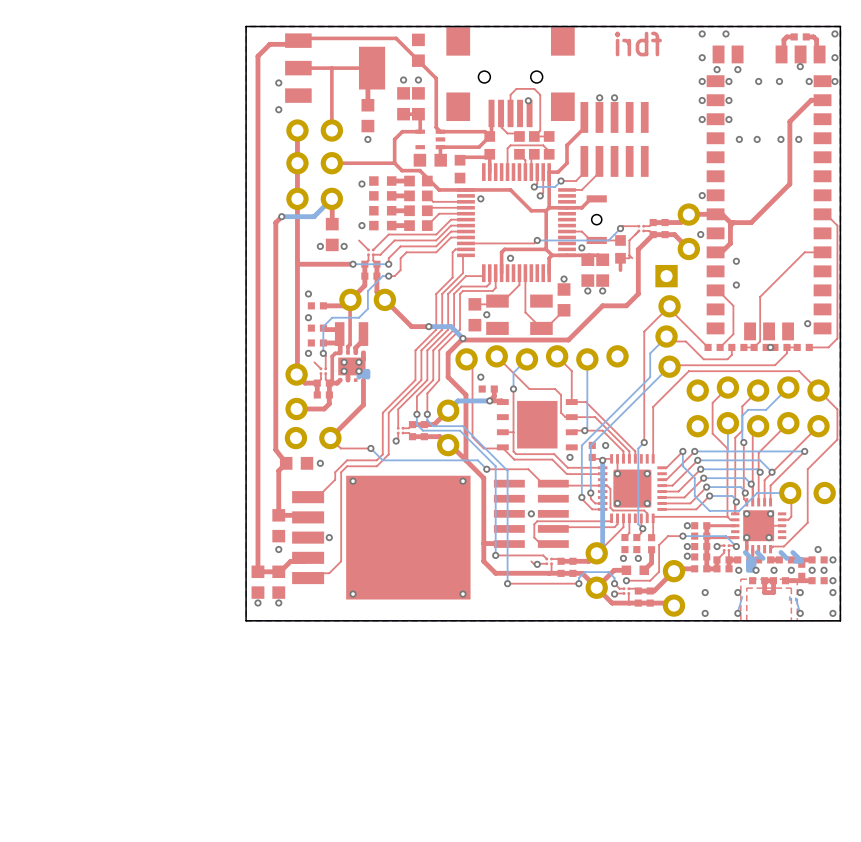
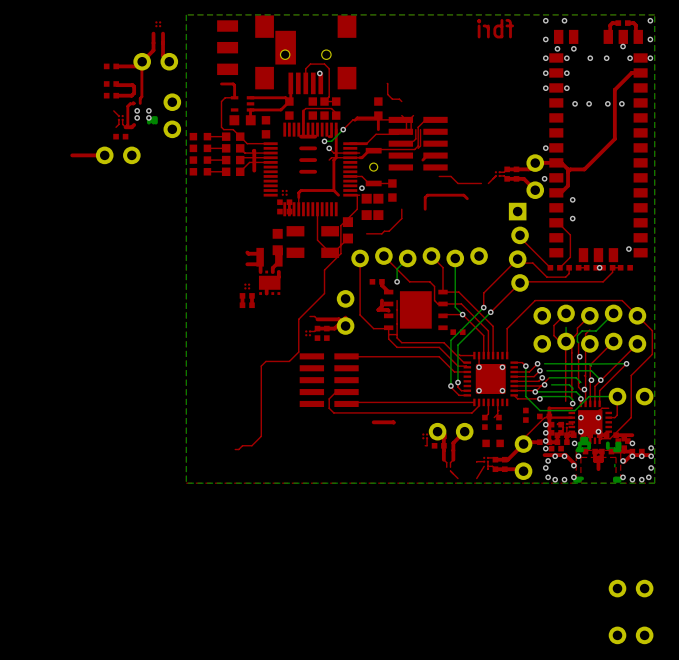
board edge: (840, 26) (246, 26) (246, 620) (840, 620) (840, 26) -> none
part: none -> (158, 24)
top track: none -> (153, 33) (153, 50) (137, 66) (116, 66)
top track: none -> (163, 33) (163, 55) (169, 61)
part: (418, 50) -> none
top track: (298, 68) (372, 68) (366, 73) (367, 105) -> none
top track: (331, 68) (331, 130) -> none
part position: (510, 77) -> (305, 54)
via: (403, 80) -> none
via: (418, 80) -> none
via: (278, 82) -> none
part: none -> (155, 61)
part: none -> (111, 66)
via: (599, 97) -> none
via: (614, 97) -> none
via: none -> (319, 73)
via: (528, 100) -> none
part: (403, 103) -> none
part: (418, 103) -> none
via: (278, 109) -> none
top track: (491, 113) (491, 134) (479, 147) (440, 147) (440, 160) -> (290, 83) (290, 100) (280, 109) (250, 109) (250, 120)
top track: (510, 113) (510, 94) (516, 88) (534, 88) (540, 94) (540, 130) (534, 136) (549, 136) -> (305, 83) (305, 68) (310, 64) (324, 64) (329, 68) (329, 96) (324, 101) (336, 101)
part: none -> (111, 83)
top track: none -> (116, 83) (134, 86) (134, 93) (131, 95) (116, 95)
top track: none -> (221, 83) (234, 85) (234, 97) (225, 97) (221, 101) (221, 127) (223, 129) (233, 129) (247, 143) (270, 143)
top track: (403, 114) (418, 114) (420, 115) (420, 131) (402, 131) (394, 139) (394, 148) -> (336, 113) (331, 108) (305, 108) (303, 110)
part: (367, 115) -> none
top track: (584, 117) (584, 127) (567, 145) (567, 163) (558, 172) (549, 172) (549, 207) (581, 207) (590, 198) (596, 198) -> none
part footprint: [286, 119, 344, 142] -> [230, 96, 255, 112]
part: none -> (111, 95)
top track: (297, 130) (296, 374) (305, 383) (317, 383) (320, 379) (320, 373) -> none
top track: none -> (250, 97) (285, 97) (289, 101)
top track: (489, 136) (484, 131) (440, 131) (436, 127) (436, 78) (396, 38) (300, 38) (294, 44) (269, 44) (257, 56) (257, 571) (280, 571) (290, 561) (304, 561) (308, 557) -> none
via: (367, 139) -> none
part: (430, 139) -> none
part rotation: 0° (614, 139) -> 90° clockwise (418, 143)
part position: (614, 139) -> (418, 143)
part: none -> (289, 108)
part: none -> (312, 108)
part: none -> (324, 108)
part: none -> (336, 108)
part: (519, 145) -> none
part: (534, 145) -> none
part: (549, 145) -> none
via: none -> (137, 110)
via: none -> (148, 110)
top track: (549, 151) (543, 145) (510, 145) (507, 148) (507, 172) -> none
part footprint: [286, 152, 344, 175] -> [229, 115, 256, 126]
part: none -> (172, 115)
part: none -> (120, 117)
via: none -> (137, 117)
via: none -> (148, 117)
top track: none -> (118, 119) (118, 124) (116, 127)
top track: none -> (400, 119) (352, 119) (343, 129)
top track: none -> (435, 119) (425, 120) (418, 127) (418, 146) (414, 149) (374, 149) (369, 150) (359, 157)
part: (430, 160) -> none
top track: (584, 161) (584, 172) (575, 181) (561, 181) -> none
top track: (331, 163) (394, 163) (402, 170) (419, 170) (439, 189) (454, 189) -> none
top track: (596, 164) (599, 161) (599, 172) (581, 189) (567, 189) -> none
part: none -> (265, 127)
part: (460, 169) -> none
top track: none -> (336, 129) (333, 190)
bottom track: none -> (343, 129) (331, 141) (324, 141)
via: none -> (343, 129)
part: none -> (120, 136)
part: none -> (200, 136)
top track: none -> (226, 136) (207, 136)
part: none -> (233, 136)
part: (382, 181) -> none
part: (418, 181) -> none
bottom track: (561, 181) (555, 186) (534, 186) -> none
via: (561, 181) -> none
via: (361, 184) -> none
via: none -> (324, 141)
via: (534, 186) -> none
top track: (474, 189) (510, 189) (531, 210) (546, 210) (546, 249) -> (366, 143) (376, 134) (398, 134) (400, 131)
part: none -> (200, 148)
top track: none -> (226, 148) (207, 148)
part: none -> (233, 148)
top track: none -> (240, 148) (244, 153) (270, 153)
part: (382, 195) -> none
part: (418, 195) -> none
via: none -> (329, 148)
via: (540, 195) -> none
part: (314, 198) -> none
bottom track: (331, 198) (314, 216) (281, 216) -> none
via: (480, 198) -> none
top track: none -> (104, 155) (72, 155)
part: none -> (118, 155)
top track: none -> (270, 157) (242, 157) (240, 160)
part: none -> (200, 160)
top track: none -> (226, 160) (207, 160)
part: none -> (233, 160)
part: (382, 210) -> none
part: (418, 210) -> none
top track: (465, 213) (439, 213) (427, 225) -> (270, 162) (249, 162) (240, 171)
top track: (825, 214) (837, 225) (837, 338) (828, 347) (809, 347) -> none
top track: (281, 216) (275, 222) (275, 449) (286, 463) (278, 470) (278, 515) (306, 515) (308, 517) -> none
via: (281, 216) -> none
top track: (465, 219) (451, 219) (436, 234) (388, 234) (373, 249) -> none
part position: (596, 219) -> (373, 167)
part position: (516, 222) -> (310, 169)
part: none -> (200, 171)
top track: none -> (226, 171) (207, 171)
part: none -> (233, 171)
via: (361, 225) -> none
part: (382, 225) -> none
part: (418, 225) -> none
top track: (465, 225) (451, 225) (436, 240) (394, 240) (380, 254) (373, 254) (373, 260) (376, 264) (376, 291) (411, 326) (428, 326) -> none
top track: (638, 226) (622, 226) (620, 228) -> none
bottom track: (620, 228) (608, 240) (537, 240) -> none
via: (620, 228) -> none
top track: (454, 231) (451, 231) (436, 246) (400, 246) (388, 258) -> (333, 190) (301, 190) (298, 197)
top track: none -> (359, 176) (369, 183) (392, 183)
part: (332, 234) -> none
top track: (653, 234) (638, 249) (638, 293) (626, 305) (602, 305) (568, 340) (461, 340) -> none
top track: (465, 237) (451, 237) (436, 252) (406, 252) (400, 258) (400, 270) (394, 276) (388, 276) -> none
top track: (359, 240) (368, 249) -> none
top track: (537, 240) (534, 243) (465, 243) -> none
via: (537, 240) -> none
top track: (629, 240) (629, 258) (620, 258) (620, 270) -> none
via: (320, 246) -> none
via: (344, 246) -> none
via: none -> (361, 188)
via: (581, 247) -> none
top track: (465, 249) (455, 249) (452, 252) (452, 277) (436, 293) (436, 329) (415, 350) (415, 380) (382, 412) (382, 454) (376, 460) (347, 460) (335, 472) (335, 479) (317, 497) (308, 497) -> none
part: none -> (392, 190)
top track: (546, 249) (552, 255) -> (333, 190) (338, 195)
top track: (546, 249) (504, 249) (501, 252) (501, 273) -> none
part: (620, 249) -> none
top track: (822, 252) (804, 252) (760, 296) (760, 341) (754, 347) -> none
top track: (368, 254) (368, 260) (364, 264) (364, 285) (344, 305) (323, 305) -> none
top track: (629, 255) (632, 258) -> none
via: (510, 258) -> none
top track: (353, 264) (297, 264) -> none
via: (353, 264) -> none
bottom track: (388, 264) (353, 264) -> none
via: (388, 264) -> none
part: none -> (366, 206)
part: none -> (378, 206)
part: (587, 270) -> none
part: (602, 270) -> none
top track: (483, 273) (483, 276) (465, 276) (448, 293) (448, 329) (427, 350) (427, 380) (398, 409) (398, 428) -> none
top track: (489, 273) (489, 283) (486, 286) (461, 286) (454, 293) (454, 329) (433, 350) (433, 380) (416, 396) (416, 414) -> none
top track: (495, 273) (495, 288) (492, 290) (463, 290) (460, 293) (460, 329) (439, 350) (439, 380) (427, 393) (427, 414) -> none
top track: (525, 273) (525, 312) (541, 328) (545, 328) (564, 310) -> (317, 209) (317, 240) (330, 252) (333, 252) (347, 238)
bottom track: (388, 276) (382, 276) (367, 290) (367, 308) (359, 317) (332, 317) (323, 326) (323, 353) -> none
via: (388, 276) -> none
via: (564, 279) -> none
via: (587, 290) -> none
via: (602, 290) -> none
via: (308, 293) -> none
top track: (350, 299) (350, 344) (348, 346) (348, 352) -> (142, 61) (140, 103)
part: (367, 299) -> none
part: none -> (347, 230)
part: (564, 299) -> none
part: (317, 305) -> none
top track: (669, 306) (644, 331) (644, 442) -> none
part: none -> (277, 242)
part: (474, 314) -> none
via: (486, 314) -> none
part position: (519, 314) -> (312, 242)
via: (308, 317) -> none
bottom track: (428, 326) (451, 326) (463, 338) -> none
via: (428, 326) -> none
part: (317, 328) -> none
bottom track: none -> (455, 258) (455, 277)
top track: none -> (517, 259) (483, 293) (483, 307)
bottom track: (666, 336) (650, 353) (650, 377) (581, 445) -> (483, 307) (450, 340) (450, 345)
top track: (463, 338) (448, 353) (448, 377) (465, 394) (465, 460) -> none
via: (463, 338) -> none
part: (317, 342) -> none
top track: (339, 351) (339, 353) (335, 353) (332, 356) (332, 380) (329, 383) -> (133, 102) (127, 106) (127, 125) (125, 127)
via: (308, 353) -> none
top track: (323, 353) (325, 355) (325, 368) -> none
via: (323, 353) -> none
top track: (496, 356) (529, 389) (555, 389) (561, 394) (561, 412) (565, 417) (595, 417) (629, 451) -> (383, 256) (409, 281) (429, 281) (434, 286) (434, 300) (437, 303) (461, 303) (488, 331) (488, 349)
top track: (557, 356) (571, 370) -> (431, 256) (442, 267) (442, 286)
part position: (542, 357) -> (419, 257)
top track: (466, 359) (472, 365) (472, 437) (483, 448) (502, 447) (514, 459) (552, 459) (566, 474) (602, 473) -> (360, 258) (360, 315) (373, 328) (388, 327) (388, 338) (397, 347) (439, 347) (457, 366) (467, 367)
bottom track: (526, 359) (513, 372) (513, 389) -> (407, 258) (397, 269) (397, 281)
top track: (314, 362) (320, 368) -> (113, 110) (118, 116)
via: (344, 362) -> none
via: (359, 362) -> none
top track: none -> (381, 281) (381, 285) (388, 292)
via: none -> (397, 281)
via: (344, 371) -> none
via: (359, 371) -> none
bottom track: (364, 371) (364, 377) -> (153, 117) (153, 122)
bottom track: (367, 371) (367, 377) -> (155, 117) (155, 122)
top track: (325, 373) (325, 379) (329, 383) -> (122, 119) (122, 124) (125, 127)
bottom track: (361, 375) (359, 371) (359, 377) -> (151, 121) (148, 117) (148, 122)
via: (480, 377) -> none
top track: (571, 378) (571, 402) (585, 402) (635, 451) -> (442, 292) (458, 292) (493, 326) (493, 349)
top track: (340, 380) (337, 383) (329, 383) -> (134, 124) (131, 127) (125, 127)
top track: (363, 380) (363, 405) (330, 438) (340, 448) (370, 448) -> none
top track: (727, 387) (712, 402) (712, 420) -> (566, 313) (553, 325)
bottom track: (788, 387) (766, 409) (748, 409) (742, 415) (742, 433) -> (613, 313) (596, 331) (582, 331) (577, 335)
part position: (488, 389) -> (377, 281)
via: (513, 389) -> none
part: (758, 389) -> none
top track: (758, 390) (742, 406) (742, 424) -> (589, 315) (577, 328)
part: (296, 391) -> none
top track: (329, 395) (329, 403) (324, 408) (296, 408) -> none
bottom track: (587, 397) (587, 428) (584, 430) -> (455, 307) (462, 314)
via: none -> (483, 307)
bottom track: (489, 400) (457, 400) (448, 410) -> none
via: (489, 400) -> none
via: none -> (490, 312)
via: none -> (462, 314)
part: none -> (589, 314)
top track: none -> (310, 316) (314, 316) (317, 319) (338, 319) (345, 326)
bottom track: (416, 414) (416, 424) (422, 430) (460, 430) (495, 466) (495, 555) -> none
via: (416, 414) -> none
bottom track: (427, 414) (427, 420) (433, 426) (463, 426) (507, 470) (507, 583) -> none
via: (427, 414) -> none
top track: (788, 423) (758, 452) (758, 470) -> (613, 341) (590, 364)
part position: (537, 424) -> (415, 309)
top track: (653, 424) (653, 406) (688, 371) (799, 371) (837, 409) (837, 427) -> (507, 328) (535, 300) (622, 300) (652, 330)
part: (758, 424) -> none
top track: (818, 426) (764, 480) (764, 497) -> (637, 343) (594, 386)
part position: (448, 427) -> (345, 312)
via: (584, 430) -> none
top track: (571, 432) (573, 430) (602, 430) (623, 451) -> (442, 315) (462, 314) (483, 335) (483, 349)
top track: (398, 433) (396, 441) -> none
top track: (402, 433) (408, 433) (412, 436) (439, 436) (483, 478) (483, 561) (495, 573) (560, 573) -> none
top track: (513, 436) (513, 451) (516, 454) (554, 454) (567, 467) (598, 467) -> (397, 338) (401, 342) (443, 342) (463, 362)
part: (313, 438) -> none
top track: (837, 439) (807, 469) (807, 522) (783, 546) (773, 546) (770, 549) -> (652, 340) (652, 354) (631, 375) (631, 417) (610, 438) (601, 438) (599, 440)
via: (396, 441) -> none
bottom track: (644, 442) (638, 448) (638, 524) (642, 528) -> none
via: (644, 442) -> none
via: (743, 442) -> none
part: none -> (589, 342)
via: (605, 445) -> none
bottom track: (370, 448) (382, 460) (477, 460) (486, 469) -> none
via: (370, 448) -> none
part rotation: 0° (592, 451) -> 90° clockwise (457, 332)
part position: (592, 451) -> (457, 332)
top track: (682, 451) (666, 467) -> (525, 366) (522, 362) (517, 362)
bottom track: (682, 451) (682, 466) (694, 478) (694, 496) (709, 510) -> (539, 398) (542, 396) (551, 396)
via: (682, 451) -> none
top track: (694, 451) (666, 479) -> (537, 363) (529, 371) (517, 371)
via: (694, 451) -> none
top track: (804, 451) (770, 485) (770, 502) -> (626, 363) (599, 390) (599, 403)
bottom track: (804, 451) (694, 451) -> none
via: (804, 451) -> none
via: (569, 457) -> none
top track: none -> (346, 356) (439, 356) (454, 371) (467, 371)
bottom track: (602, 460) (602, 547) (596, 553) -> none
via: (602, 460) -> none
top track: (697, 460) (672, 485) -> (539, 370) (534, 376) (522, 376)
bottom track: (697, 460) (760, 460) (772, 472) -> none
via: (697, 460) -> none
via: none -> (579, 356)
part: (296, 463) -> none
via: (320, 463) -> none
top track: (486, 469) (528, 469) (543, 484) (607, 485) (610, 488) (610, 507) (613, 510) (644, 510) (647, 513) (647, 518) -> none
via: (486, 469) -> none
via: none -> (537, 363)
top track: (700, 469) (678, 491) -> (542, 377) (538, 381) (527, 381)
via: (700, 469) -> none
bottom track: none -> (626, 363) (566, 364)
via: none -> (626, 363)
bottom track: none -> (525, 366) (525, 396) (539, 410) (575, 410) (589, 396) (617, 396)
via: none -> (525, 366)
via: (760, 472) -> none
via: (772, 472) -> none
via: none -> (539, 370)
top track: (703, 478) (684, 497) -> (544, 384) (531, 386)
via: (703, 478) -> none
bottom track: (745, 478) (751, 484) -> (579, 370) (591, 370) (600, 380)
via: (353, 481) -> none
via: (463, 481) -> none
via: (751, 484) -> none
via: none -> (542, 377)
via: (706, 487) -> none
via: none -> (591, 380)
via: none -> (600, 380)
via: (745, 493) -> none
top track: (790, 493) (791, 516) (788, 519) (782, 519) -> none
bottom track: (790, 493) (757, 493) (739, 510) (732, 510) -> (572, 403) (572, 399) (569, 396)
part position: (807, 493) -> (631, 396)
via: none -> (544, 384)
top track: (709, 496) (696, 509) (662, 509) -> (539, 398) (517, 398) (514, 395)
via: (709, 496) -> none
via: (736, 501) -> none
via: none -> (584, 389)
top track: none -> (585, 389) (585, 403)
top track: none -> (590, 389) (590, 403)
top track: none -> (594, 389) (594, 403)
bottom track: none -> (535, 391) (576, 391) (580, 396)
via: none -> (535, 391)
top track: none -> (617, 396) (617, 415) (614, 417) (608, 417)
part position: (531, 513) -> (329, 380)
via: (531, 513) -> none
via: none -> (539, 398)
via: (770, 513) -> none
top track: (611, 518) (611, 521) (537, 521) (534, 524) (534, 537) (540, 544) (553, 544) -> (474, 402) (348, 402) (346, 403)
top track: (623, 518) (623, 527) (588, 561) (561, 561) (561, 559) (551, 559) -> none
top track: (735, 519) (730, 519) (727, 516) (653, 516) (653, 537) (651, 537) -> none
via: none -> (572, 403)
top track: (617, 522) (614, 527) (555, 527) (553, 528) -> (479, 405) (472, 412) (333, 412) (329, 408) (329, 398) (336, 392) (346, 392)
part: (278, 525) -> none
via: (687, 525) -> none
part: (700, 525) -> none
part position: (758, 525) -> (590, 422)
via: (642, 528) -> none
part: none -> (525, 415)
top track: (682, 536) (668, 536) (659, 545) (659, 571) (650, 580) (626, 580) -> none
bottom track: (682, 536) (725, 536) (736, 546) -> none
via: (682, 536) -> none
top track: none -> (546, 416) (523, 438)
via: (329, 537) -> none
part: (381, 537) -> none
part: (636, 543) -> none
part: none -> (498, 422)
part: (651, 543) -> none
via: (687, 546) -> none
part: (700, 546) -> none
via: none -> (545, 424)
part: none -> (556, 424)
via: (717, 546) -> none
via: (736, 546) -> none
via: (278, 549) -> none
top track: (651, 549) (651, 562) (644, 570) (647, 570) -> none
via: (818, 549) -> none
bottom track: (757, 552) (763, 558) (754, 558) (754, 561) (748, 561) (748, 558) (751, 558) (745, 552) -> none
bottom track: (780, 552) (786, 558) -> none
bottom track: (792, 552) (798, 558) (801, 558) (801, 561) (795, 561) (795, 558) -> none
top track: (495, 555) (543, 555) (546, 559) -> none
via: (495, 555) -> none
top track: none -> (437, 431) (443, 437) (443, 459) (446, 462) (446, 467)
top track: none -> (464, 431) (453, 443) (453, 459) (450, 462) (450, 467)
via: none -> (580, 431)
via: none -> (598, 431)
via: (687, 556) -> none
part: (700, 556) -> none
via: none -> (545, 432)
part: none -> (556, 432)
via: (623, 558) -> none
via: (638, 558) -> none
part position: (818, 559) -> (623, 441)
via: (832, 559) -> none
top track: (531, 561) (533, 563) (546, 563) -> none
via: (537, 564) -> none
via: none -> (545, 441)
part rotation: 0° (596, 570) -> 90° clockwise (451, 431)
top track: (626, 570) (614, 570) (596, 587) -> none
via: (756, 570) -> none
bottom track: none -> (589, 443) (589, 448) (577, 450) (579, 443)
via: (774, 570) -> none
bottom track: none -> (607, 443) (607, 448) (614, 448) (614, 450) (619, 450) (619, 448)
via: (791, 570) -> none
bottom track: none -> (617, 443) (617, 448) (619, 448)
bottom track: none -> (619, 443) (619, 448)
via: (824, 570) -> none
top track: (561, 573) (582, 573) (612, 603) (638, 603) -> (487, 466) (492, 466) (495, 469)
via: none -> (545, 448)
part: none -> (556, 448)
via: none -> (651, 448)
via: (626, 580) -> none
via: (832, 580) -> none
part: (257, 582) -> none
part: (278, 582) -> none
via: (507, 583) -> none
top track: (578, 583) (507, 583) -> none
via: (578, 583) -> none
top track: (614, 583) (619, 588) (624, 588) -> none
bottom track: (614, 583) (614, 578) (608, 572) (584, 572) (578, 578) (578, 583) -> none
via: (614, 583) -> none
top track: none -> (544, 455) (565, 455) (575, 464)
top track: none -> (649, 455) (631, 455) (624, 462)
via: none -> (555, 456)
via: none -> (564, 456)
via: none -> (578, 456)
top track: none -> (601, 456) (598, 457) (598, 469)
via: none -> (632, 456)
via: none -> (641, 456)
via: none -> (651, 456)
via: (737, 592) -> none
via: (832, 592) -> none
via: (353, 594) -> none
via: (463, 594) -> none
via: (614, 594) -> none
bottom track: (742, 597) (737, 613) -> none
via: none -> (573, 465)
top track: none -> (484, 466) (476, 478)
bottom track: (795, 600) (800, 613) -> none
via: none -> (545, 467)
via: none -> (651, 467)
via: (257, 602) -> none
via: (278, 602) -> none
top track: none -> (450, 471) (457, 478)
bottom track: none -> (582, 478) (573, 479)
bottom track: none -> (619, 478) (614, 478) (614, 480) (623, 479)
via: none -> (555, 479)
via: none -> (564, 479)
via: none -> (632, 479)
via: none -> (641, 479)
bottom track: none -> (579, 480) (575, 480)
part: none -> (631, 588)
part: none -> (631, 635)

